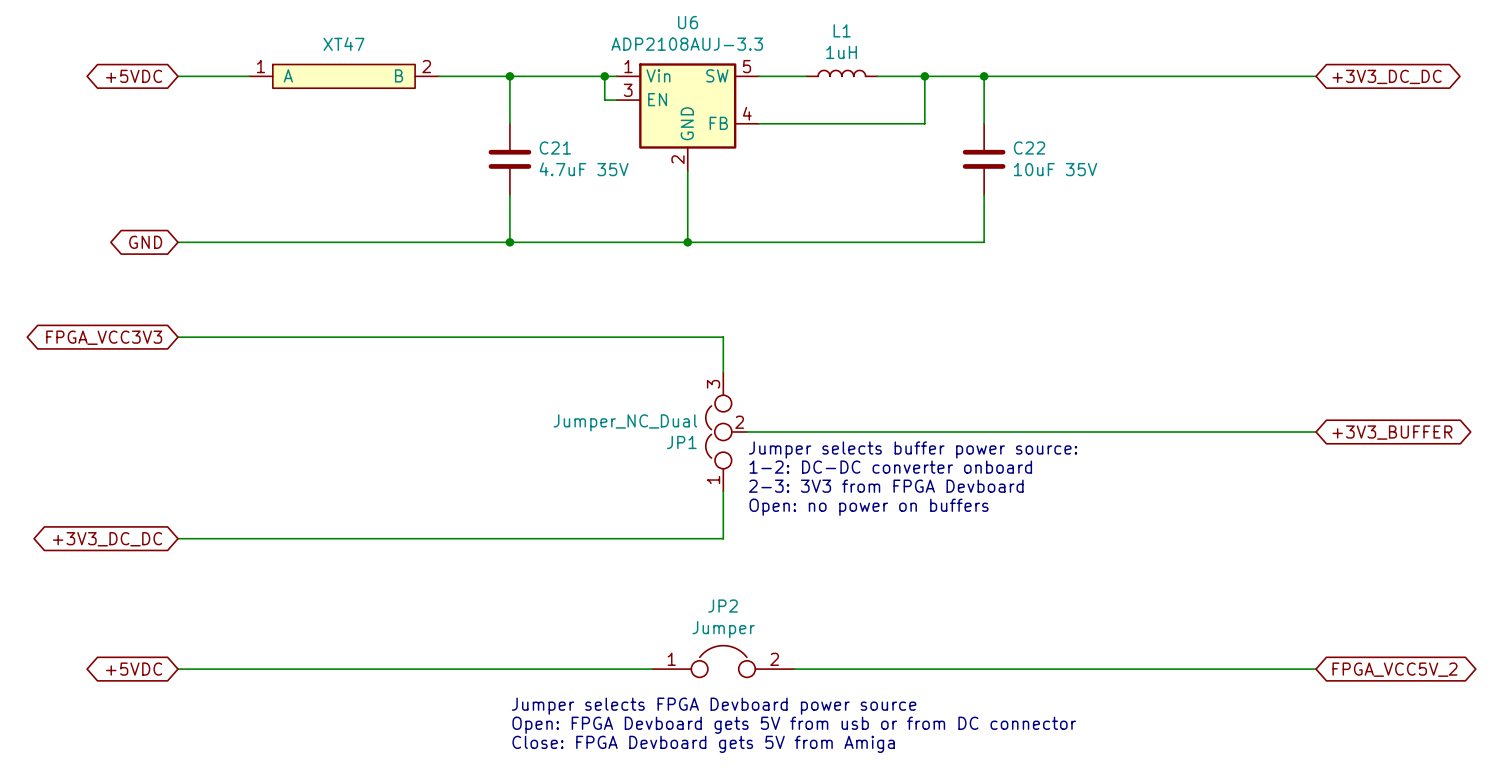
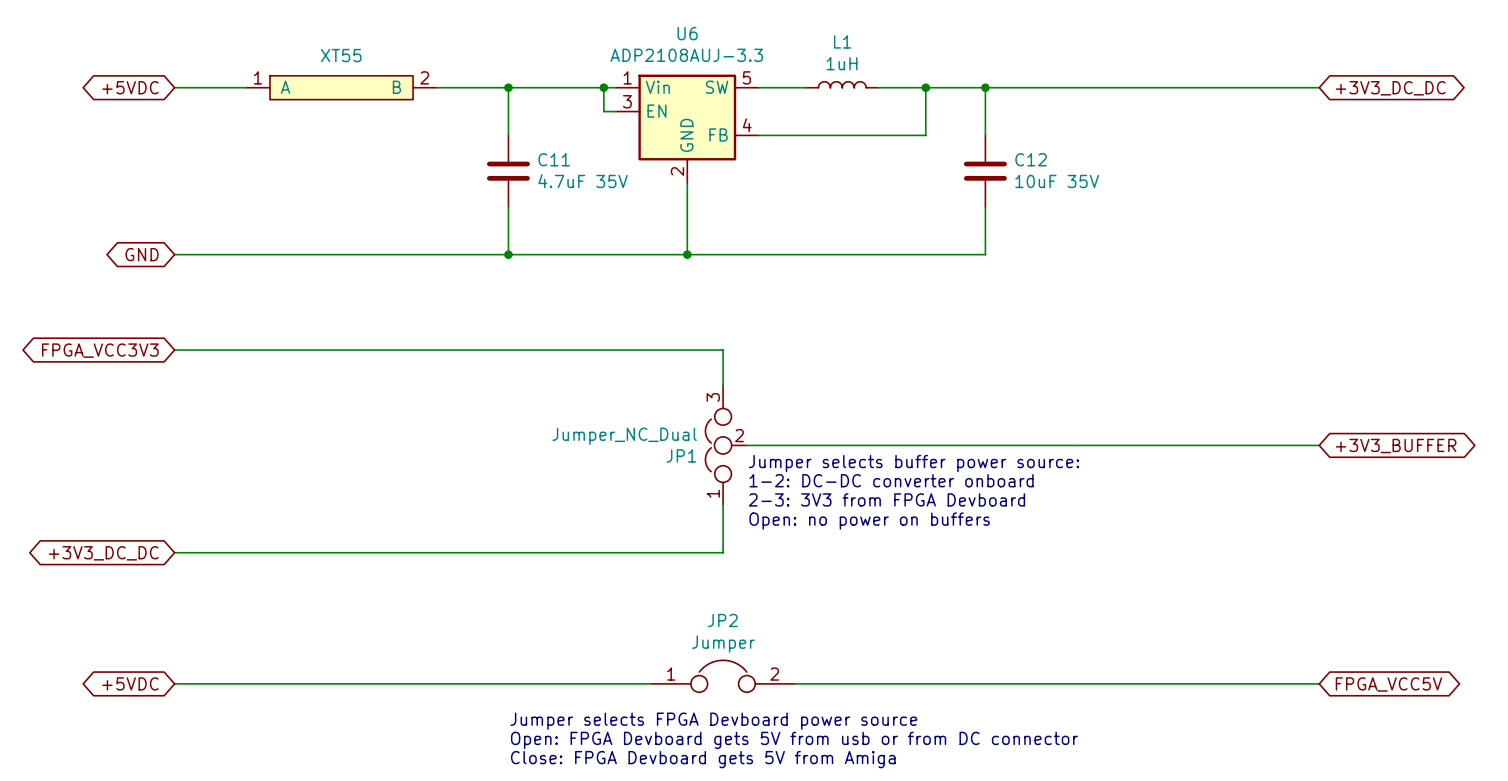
XT47 name: XT47 (343, 44) -> XT55 (341, 55)
C21 name: C21 (555, 147) -> C11 (554, 159)
C22 name: C22 (1029, 147) -> C12 (1031, 159)
global label: FPGA_VCC5V_2 (1394, 669) -> FPGA_VCC5V (1388, 684)

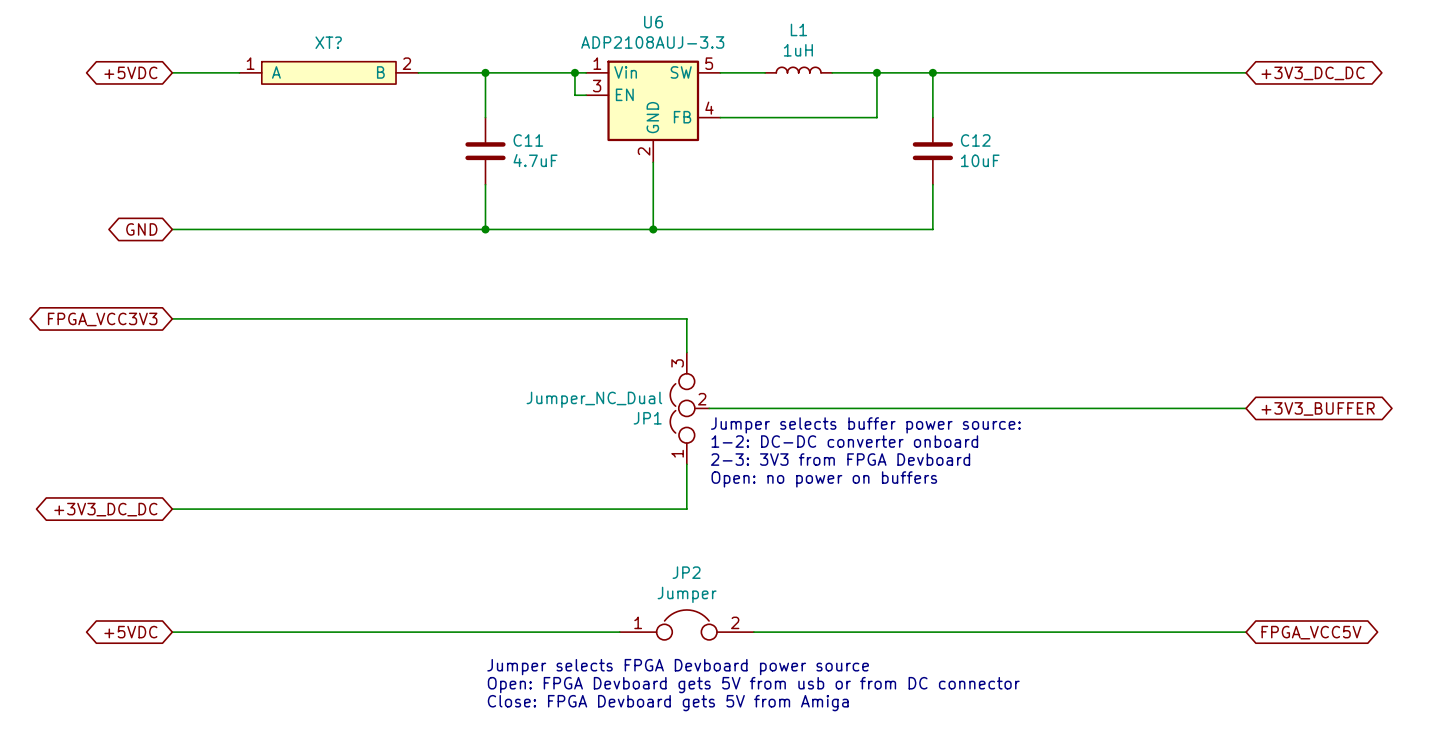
XT55 name: XT55 (341, 55) -> XT? (328, 42)
C11 value: 4.7uF 35V (583, 181) -> 4.7uF (535, 160)
C12 value: 10uF 35V (1057, 181) -> 10uF (980, 160)

